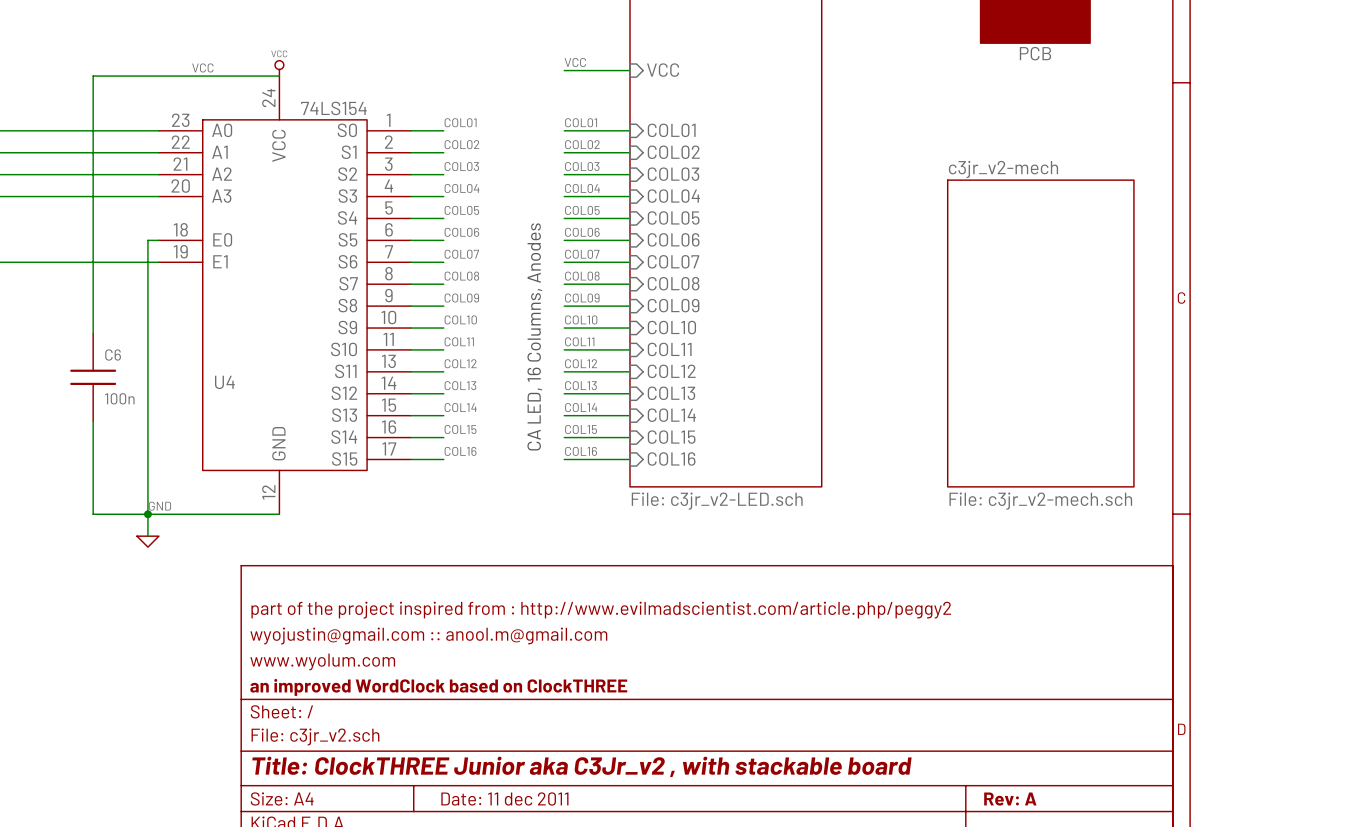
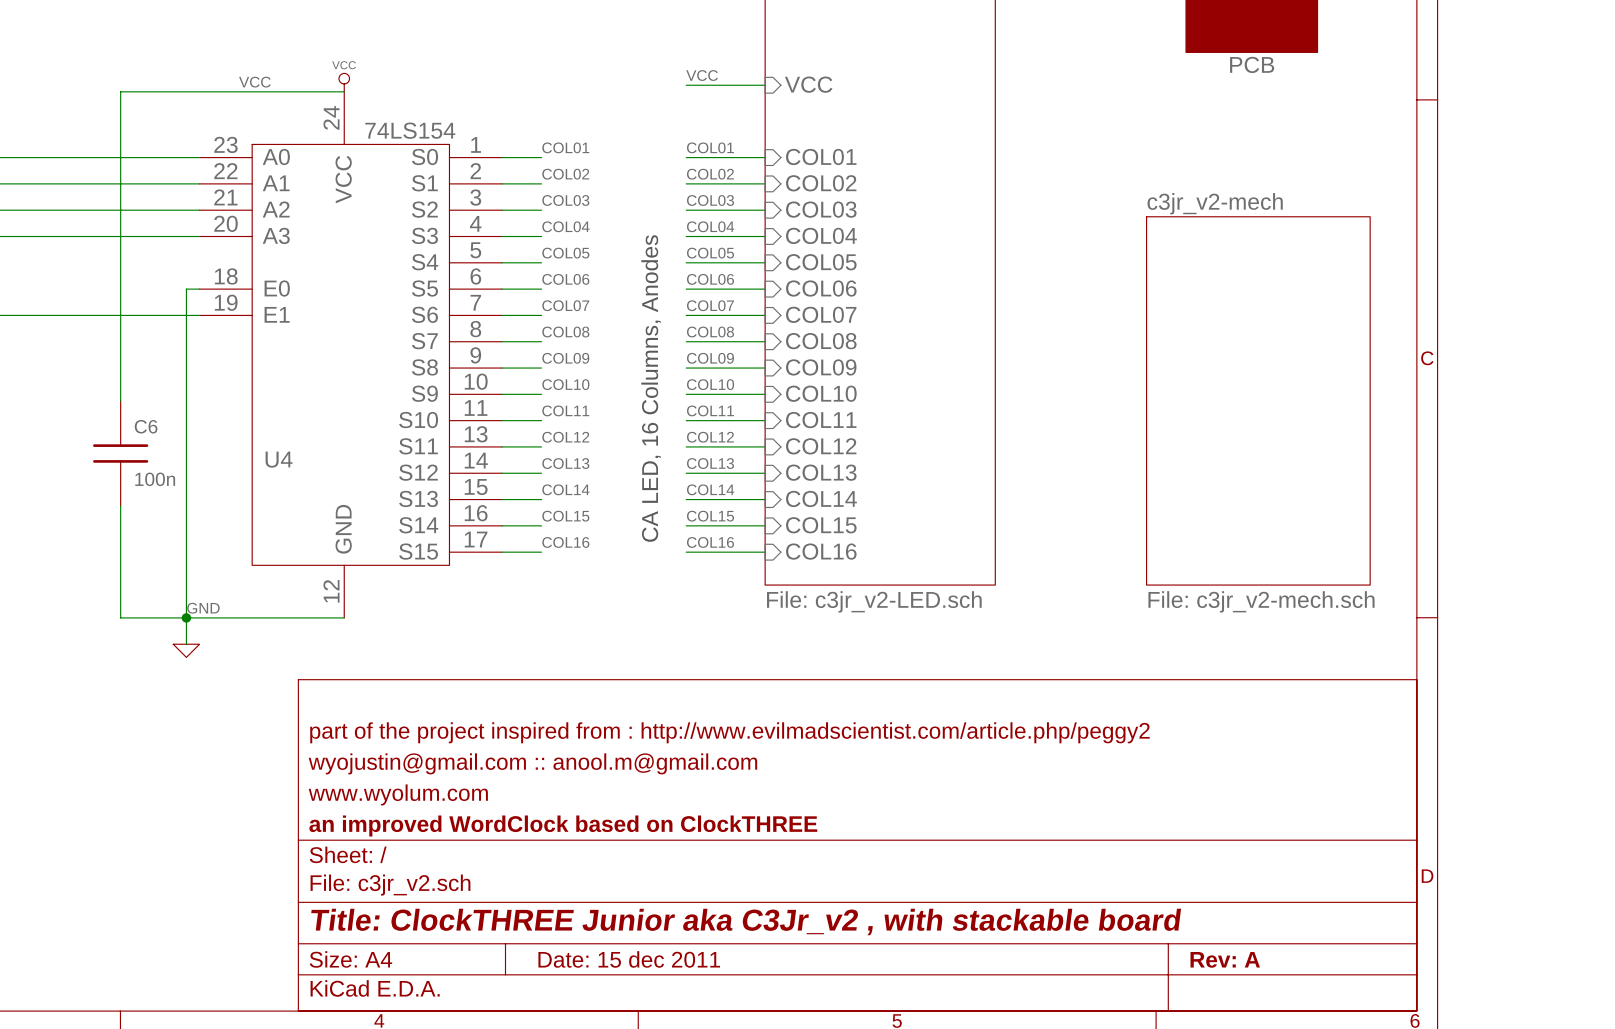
title block: Date: 11 dec 2011 (504, 798) -> Date: 15 dec 2011 (629, 959)

